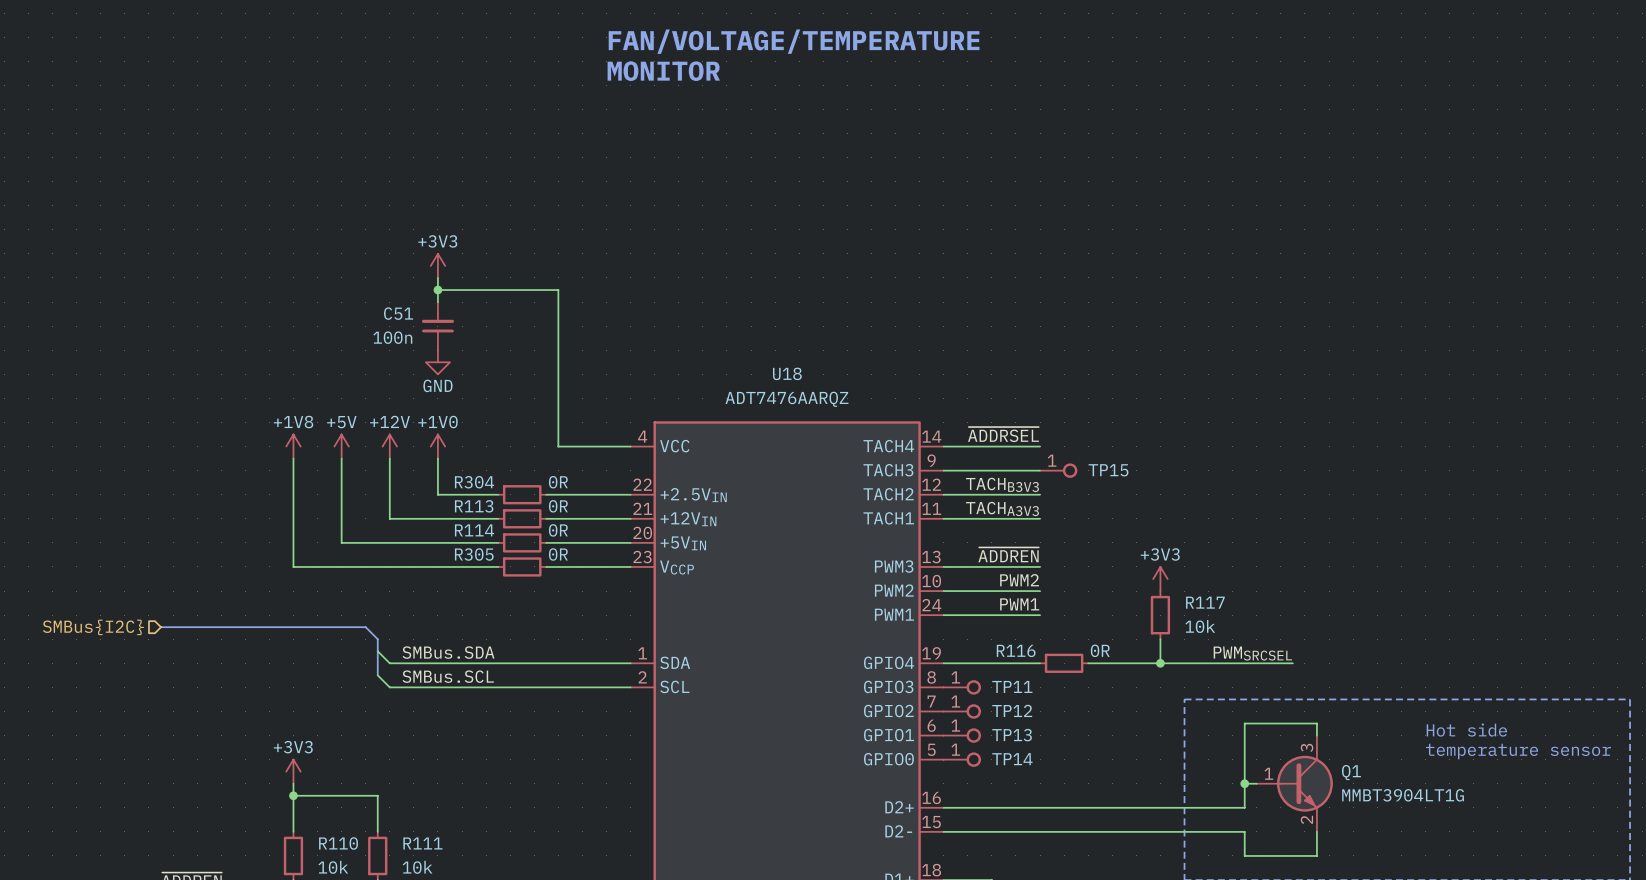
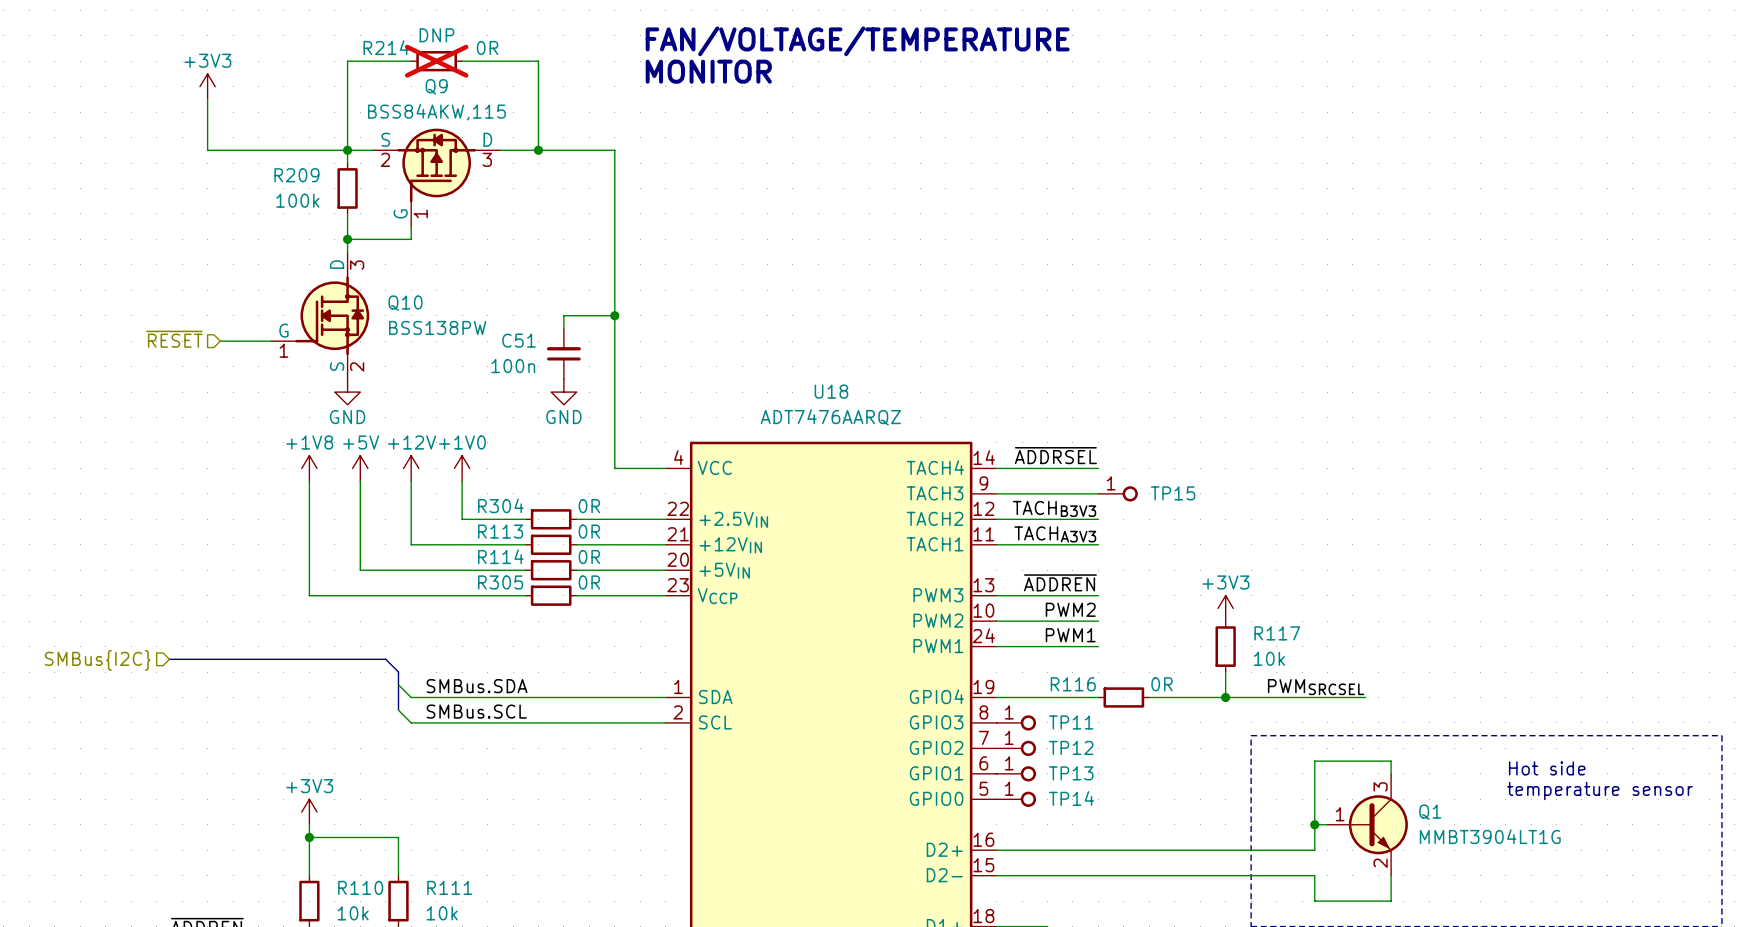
wire: none -> (411, 61) (347, 61) (347, 163)
R214: none -> (436, 61)
wire: none -> (462, 61) (538, 61) (538, 150)
power symbol: none -> +3V3 (207, 86)
wire: none -> (207, 99) (207, 150) (373, 150)
junction: none -> (347, 150)
junction: none -> (538, 150)
Q9: none -> (436, 177)
R209: none -> (347, 188)
wire: none -> (347, 213) (347, 252)
wire: none -> (411, 226) (411, 239) (347, 239)
junction: none -> (347, 239)
power symbol: +3V3 (437, 265) -> none
wire: (437, 277) (437, 302) -> none
wire: (437, 290) (558, 290) (558, 446) (582, 446) -> (500, 150) (614, 150) (614, 468)
junction: (437, 290) -> none
Q10: none -> BSS138PW (320, 315)
wire: none -> (614, 315) (563, 315) (563, 328)
junction: none -> (614, 315)
hierarchical label: none -> ~{RESET} (174, 339)
wire: none -> (220, 341) (271, 341)
C51 position: (437, 326) -> (563, 353)
power symbol: GND (437, 362) -> none
power symbol: none -> GND (347, 392)
power symbol: none -> GND (563, 392)

